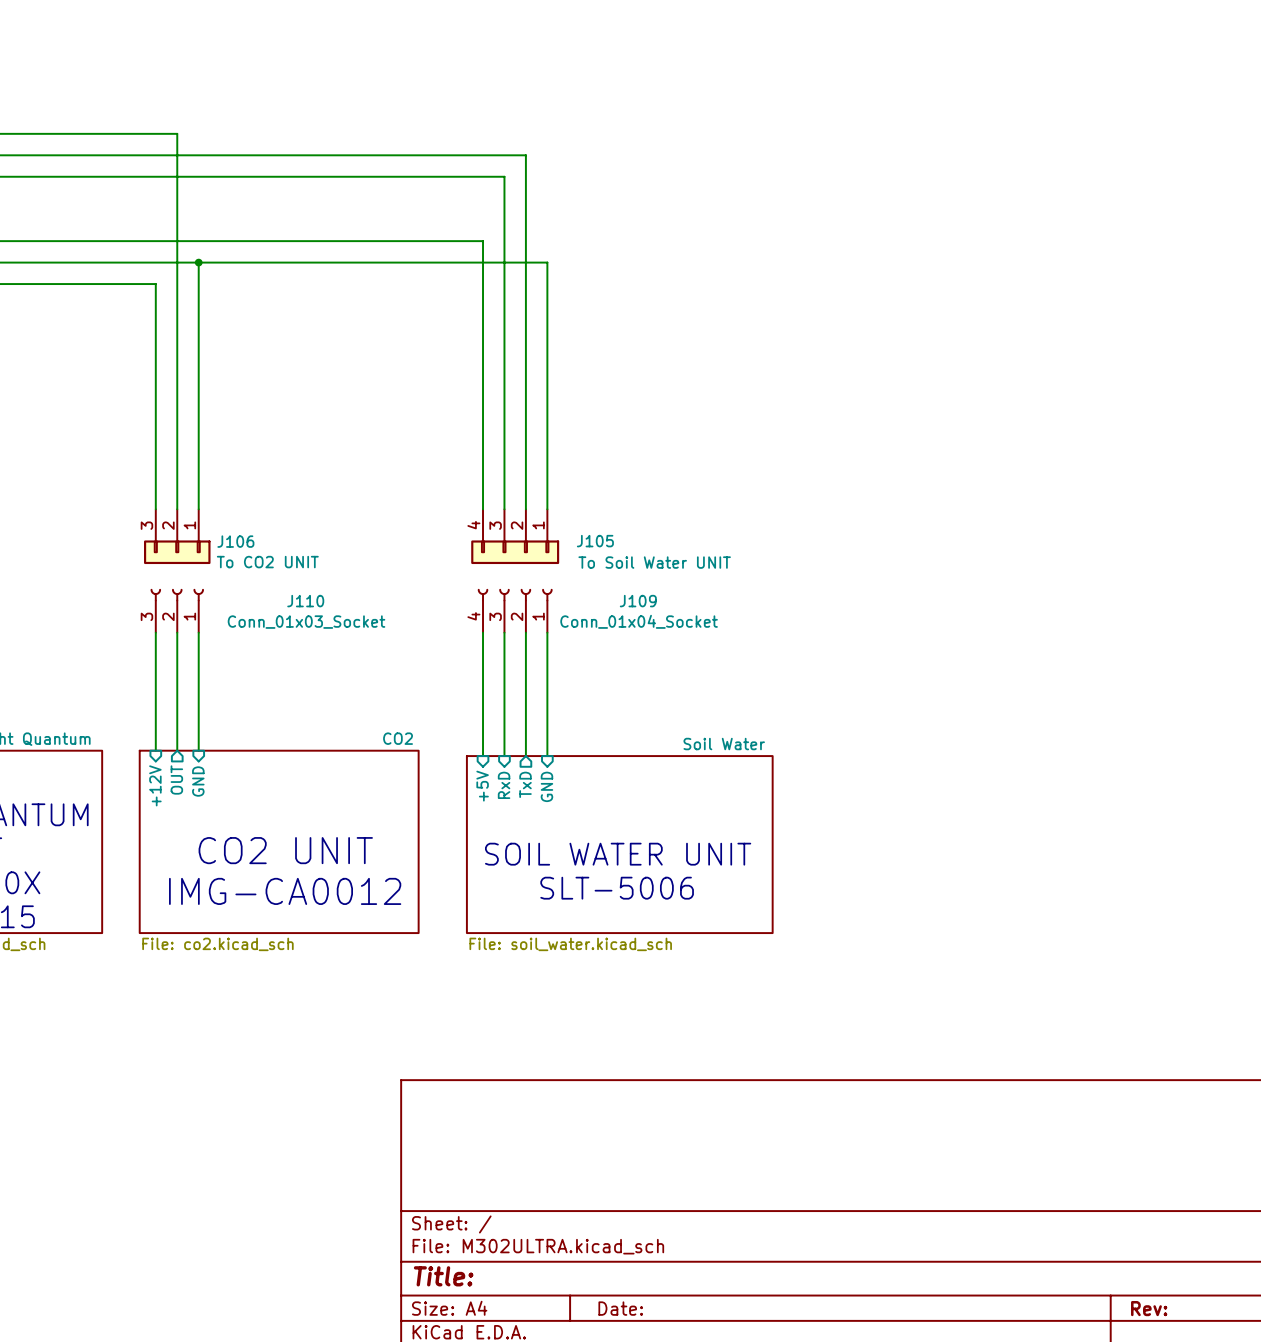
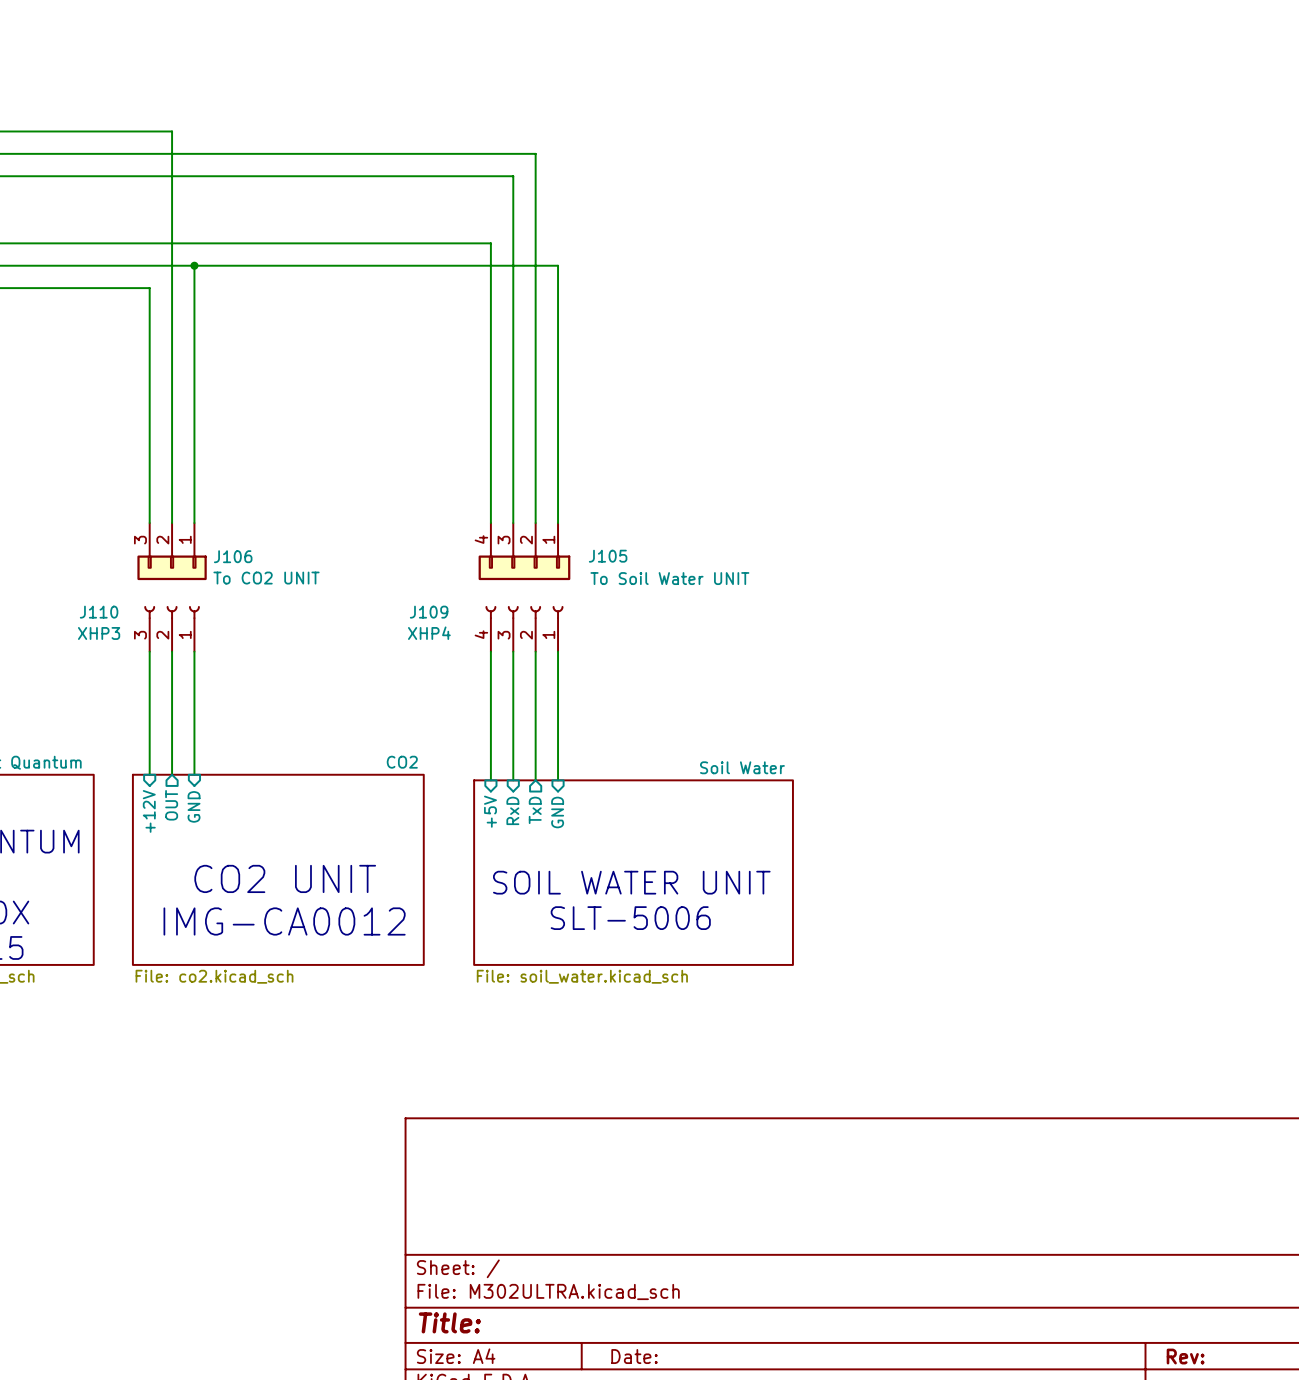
J110 name position: J110 (305, 601) -> J110 (99, 612)
J109 name position: J109 (638, 601) -> J109 (429, 612)
J109 value: Conn_01x04_Socket (639, 621) -> XHP4 (429, 633)
J110 value: Conn_01x03_Socket (306, 622) -> XHP3 (99, 633)

